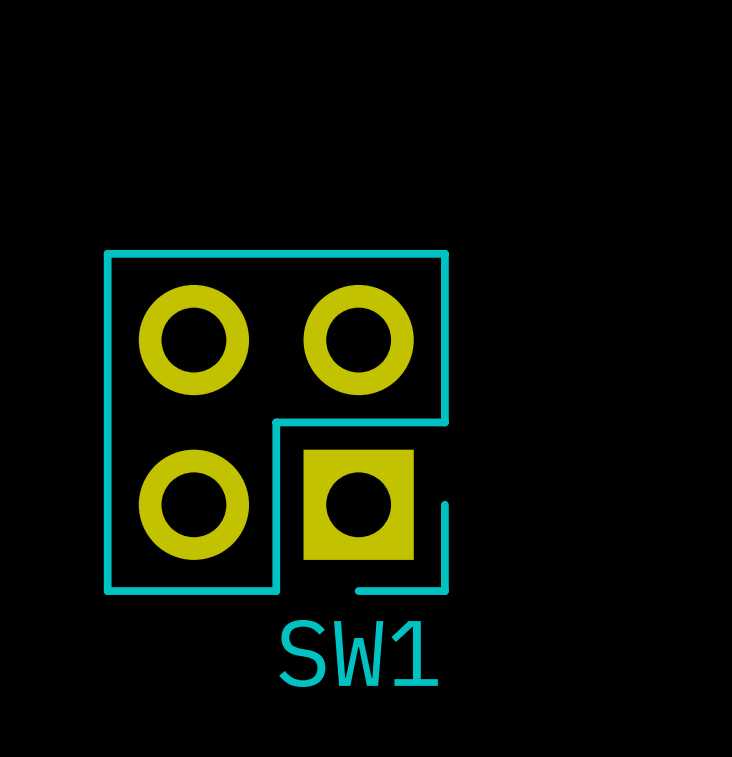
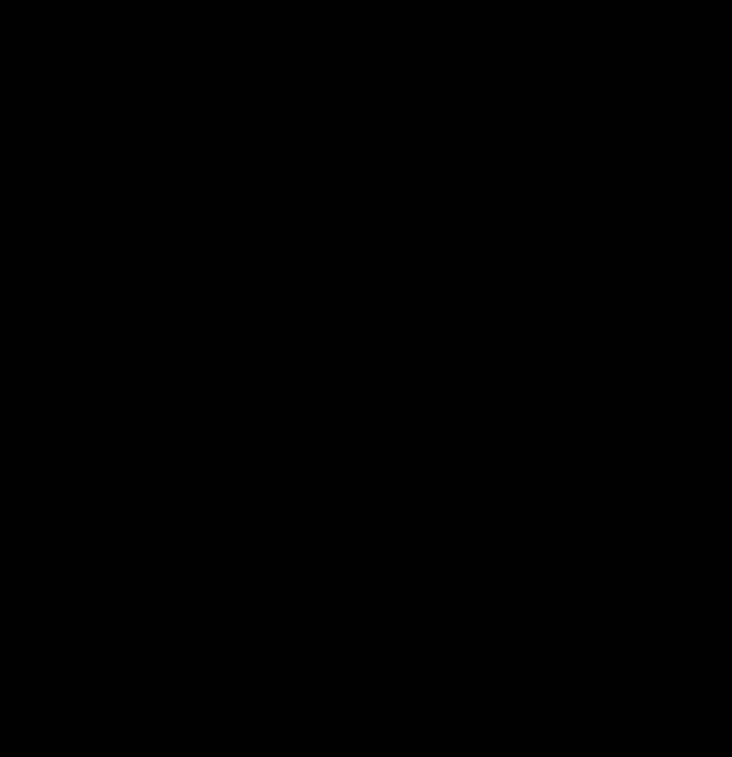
SW1: (276, 422) -> none

